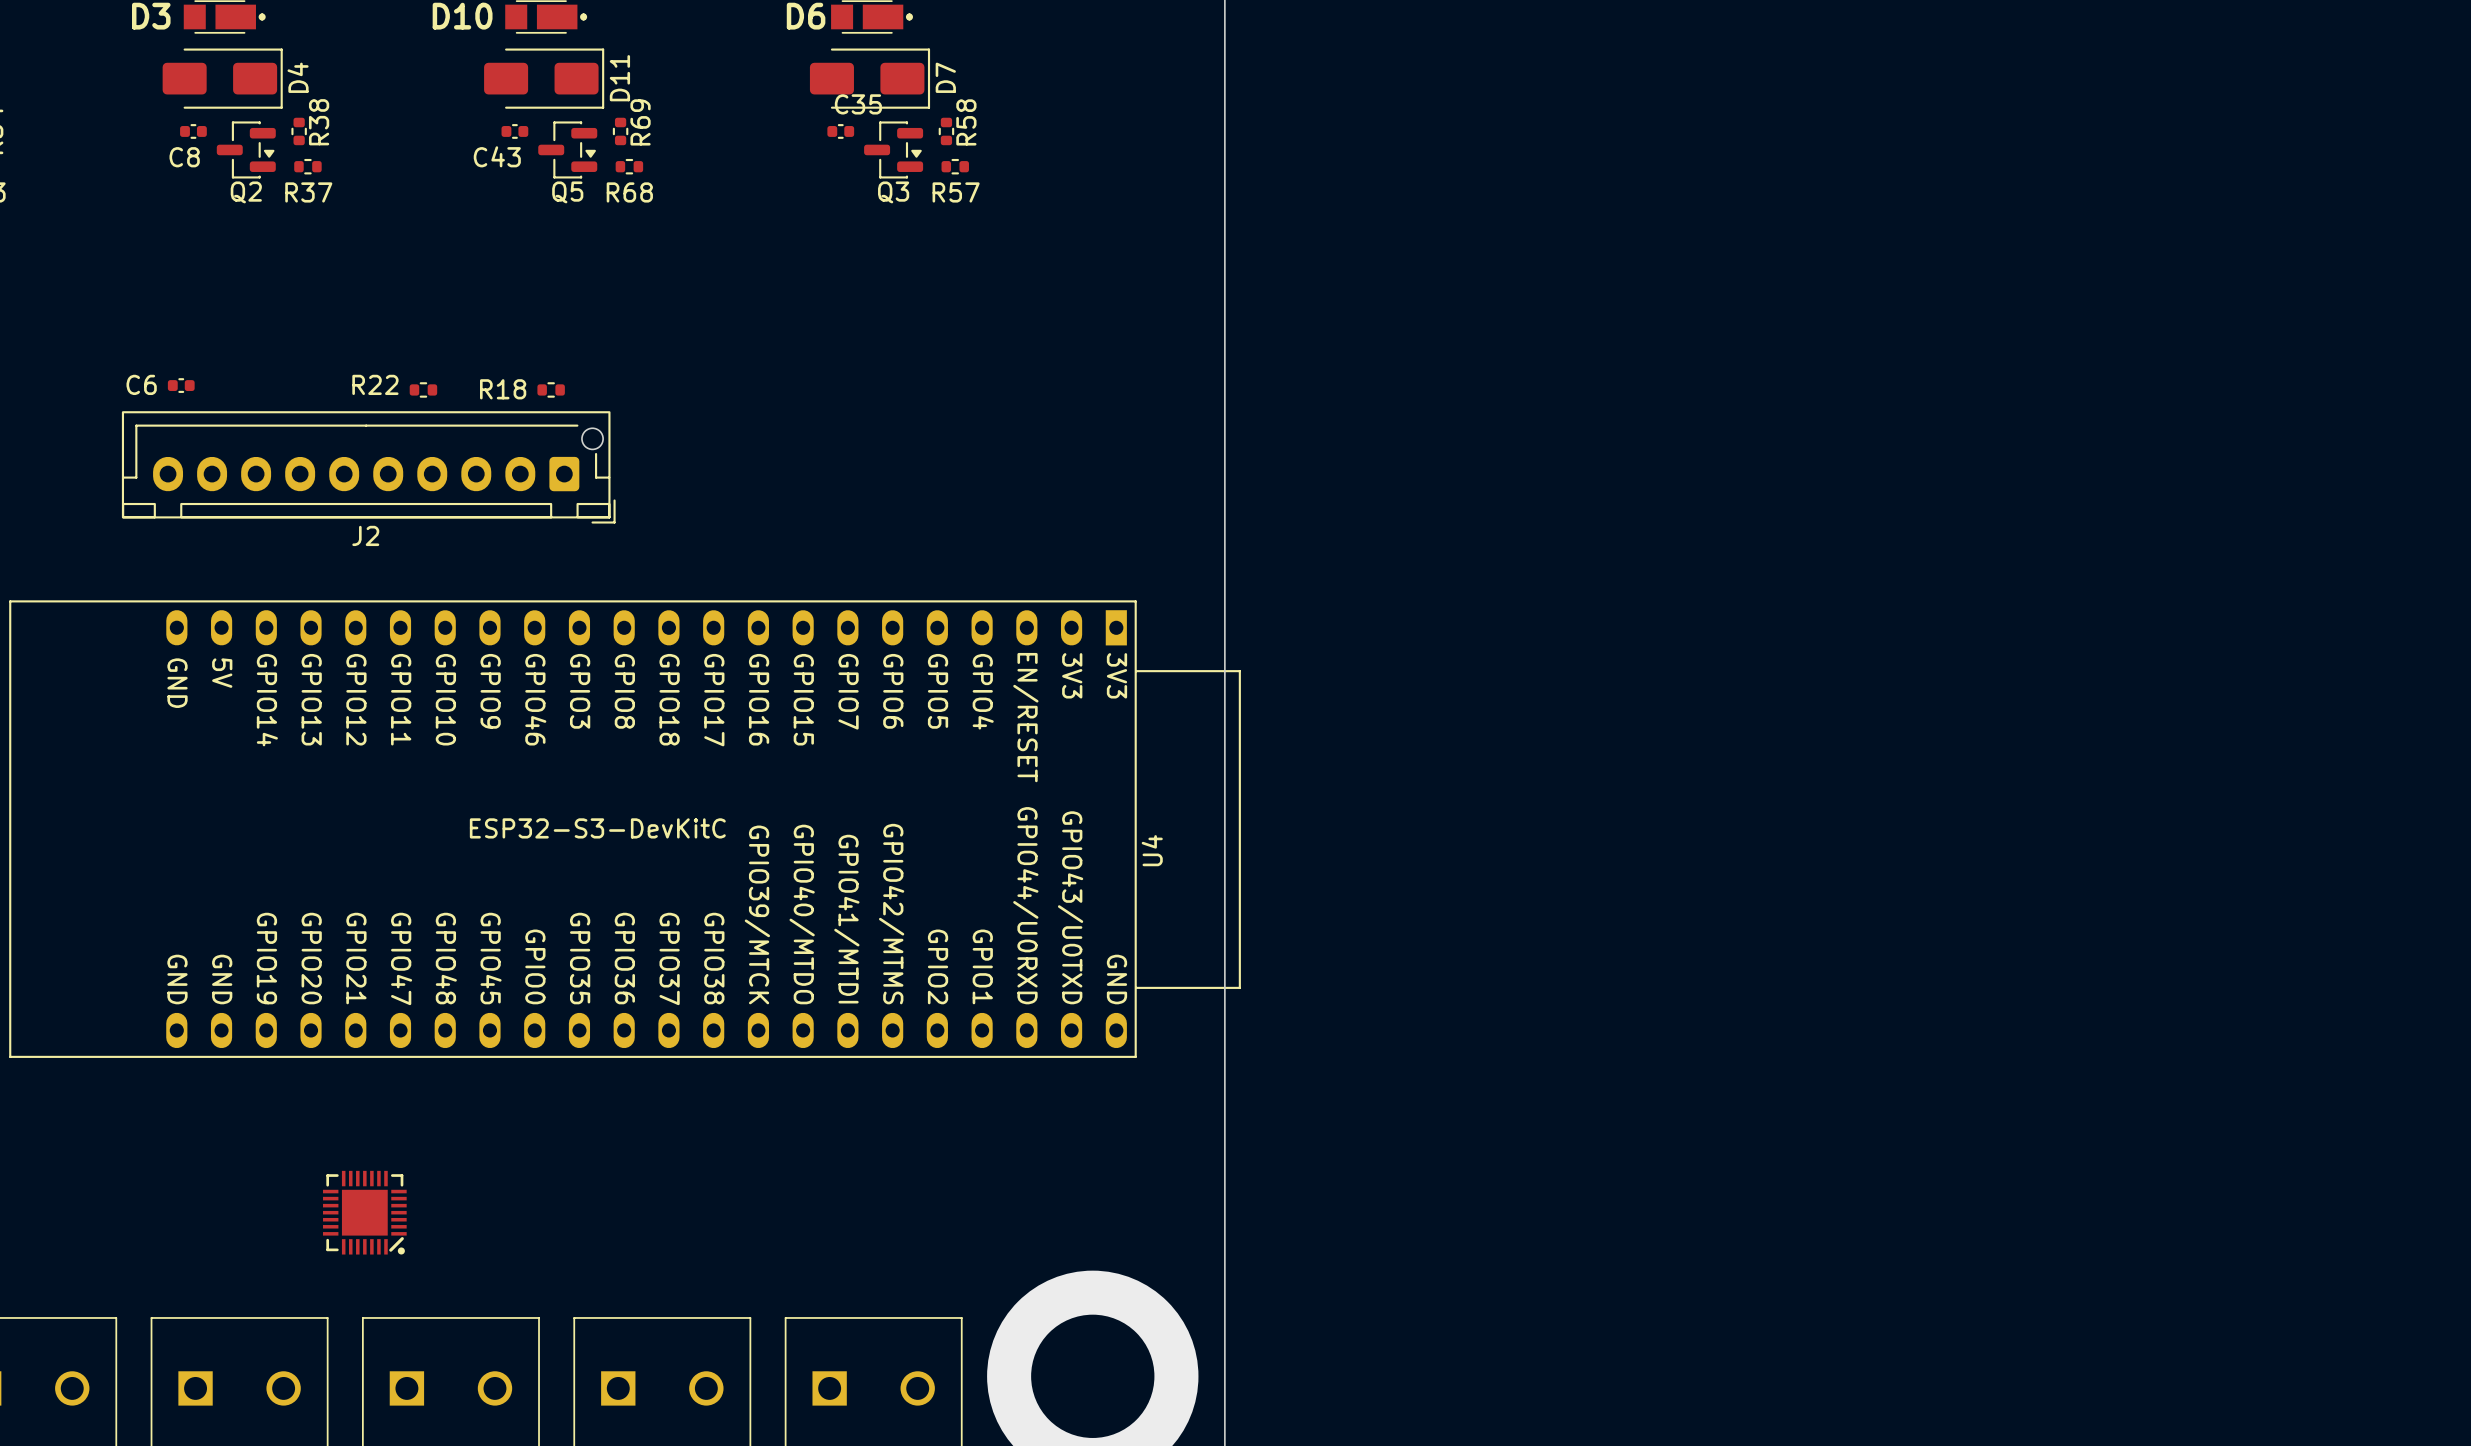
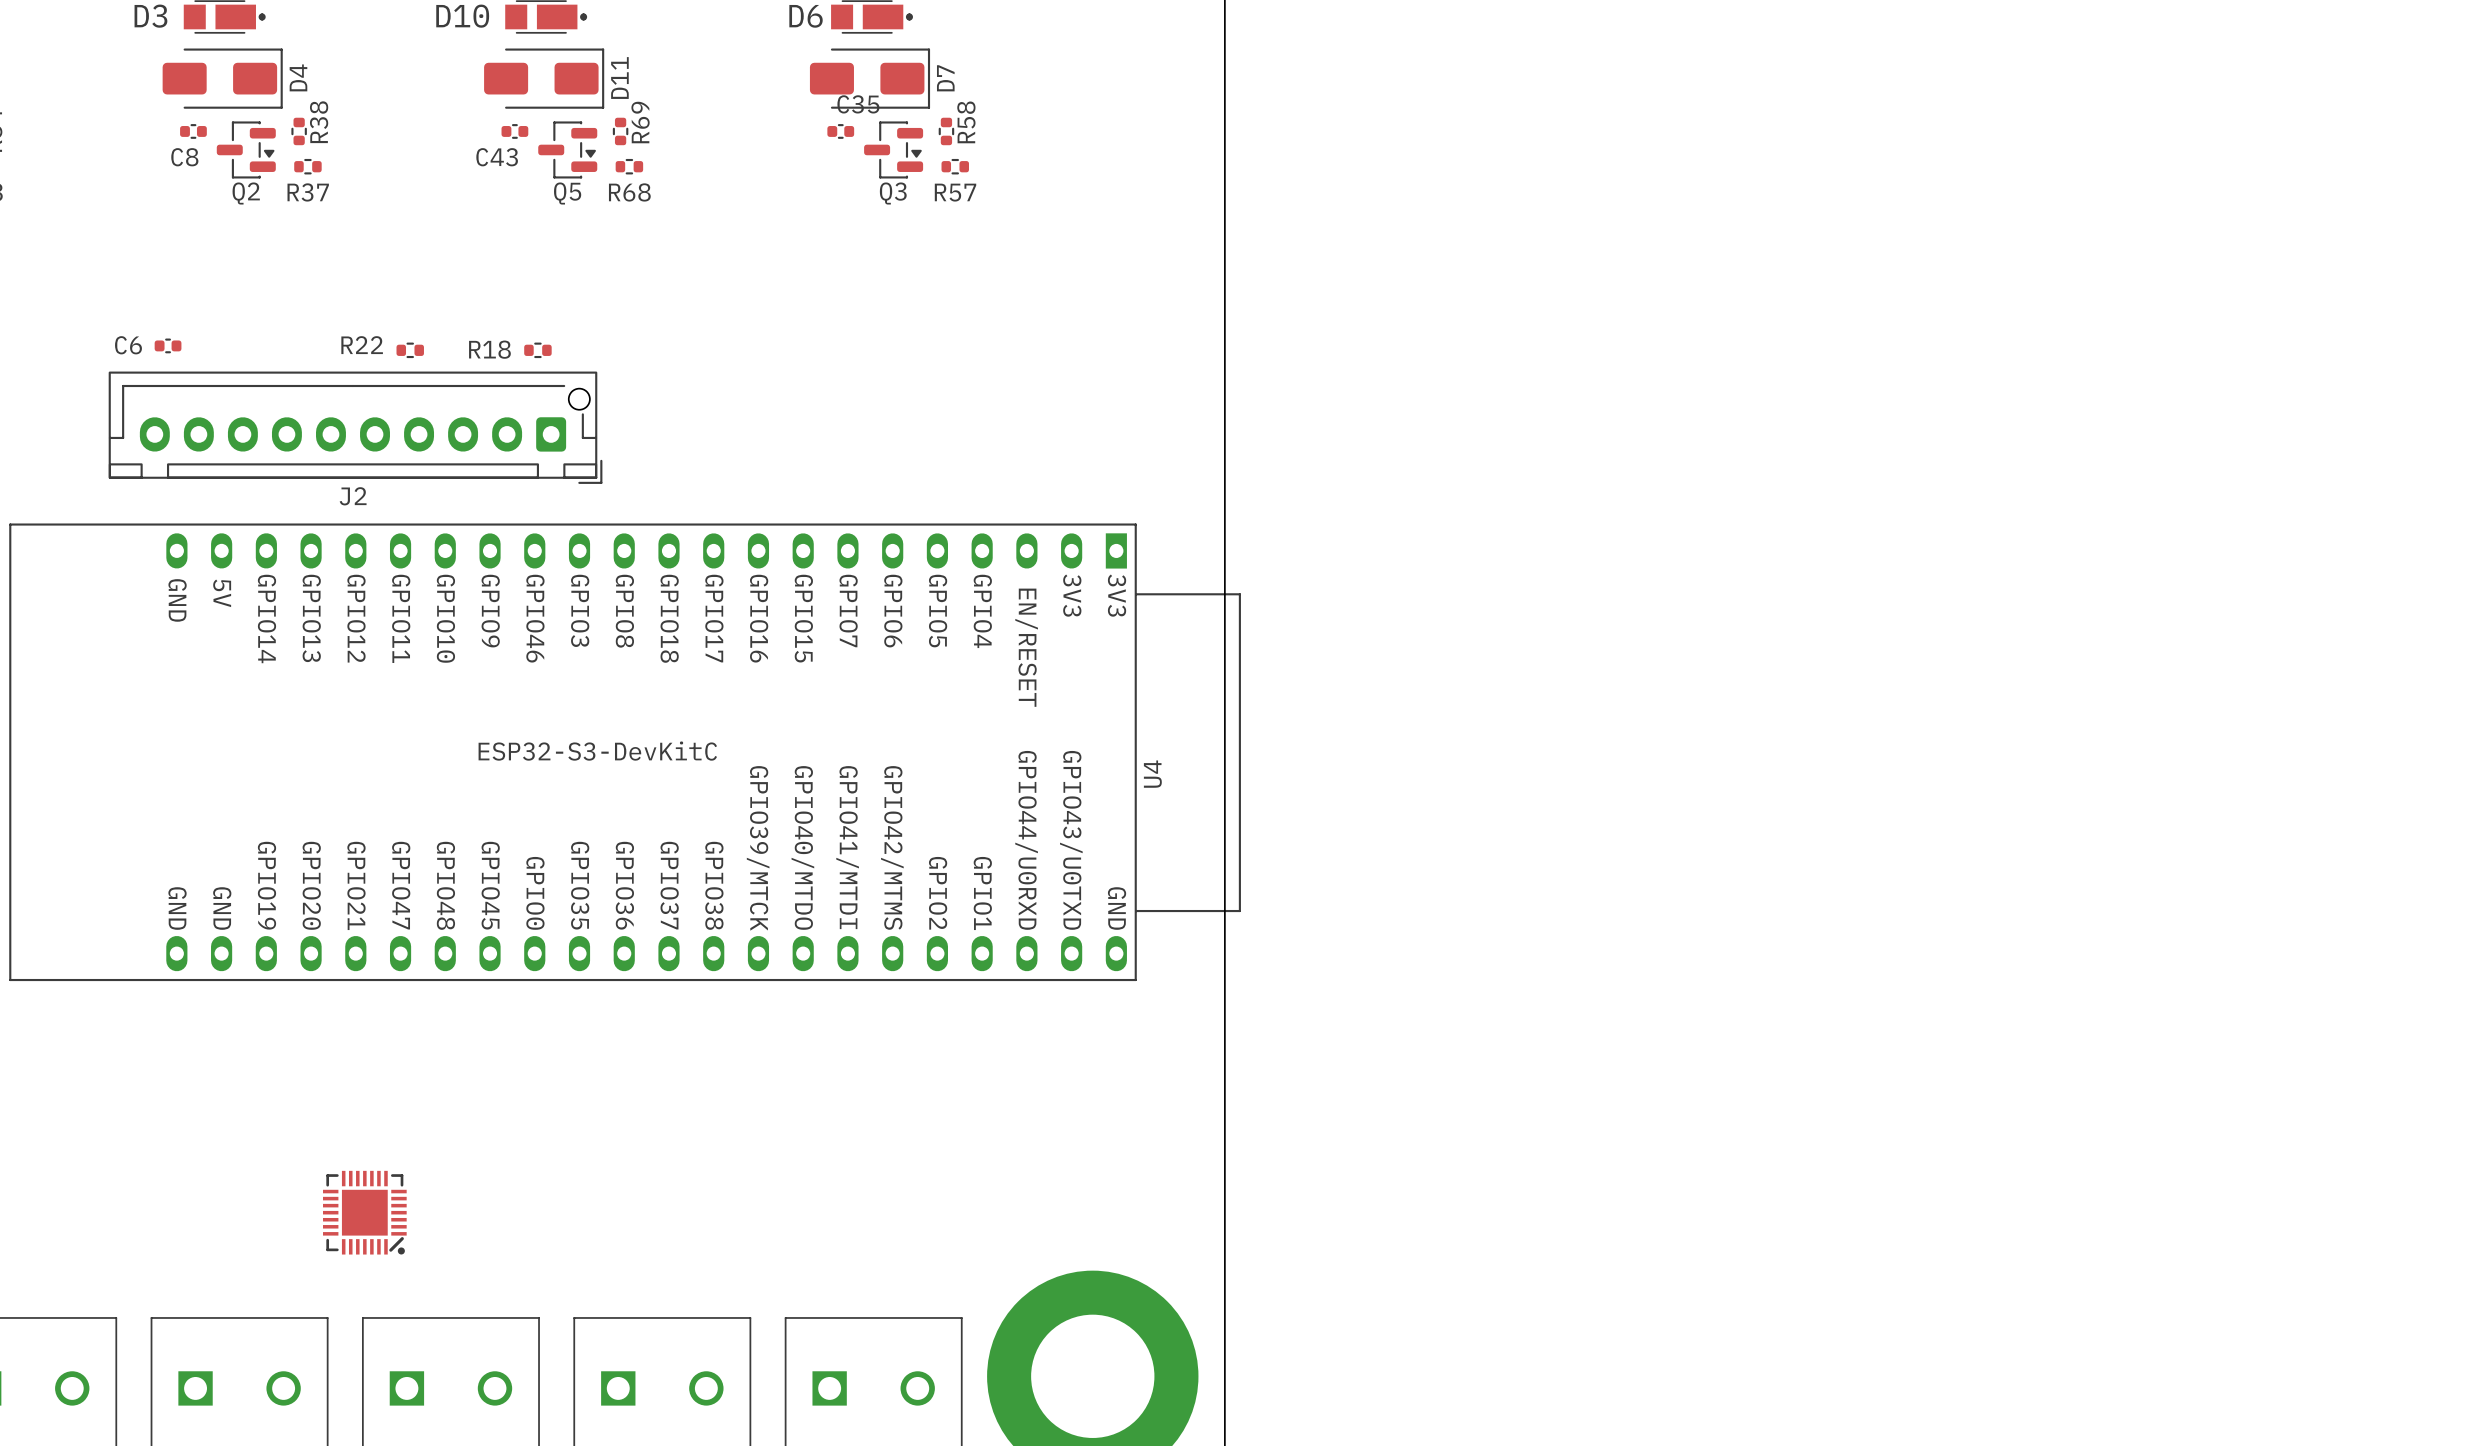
C6 position: (181, 385) -> (168, 345)
R22 position: (423, 389) -> (410, 350)
R18 position: (551, 389) -> (537, 350)
J2 position: (368, 467) -> (355, 427)
U4 position: (625, 829) -> (625, 752)

